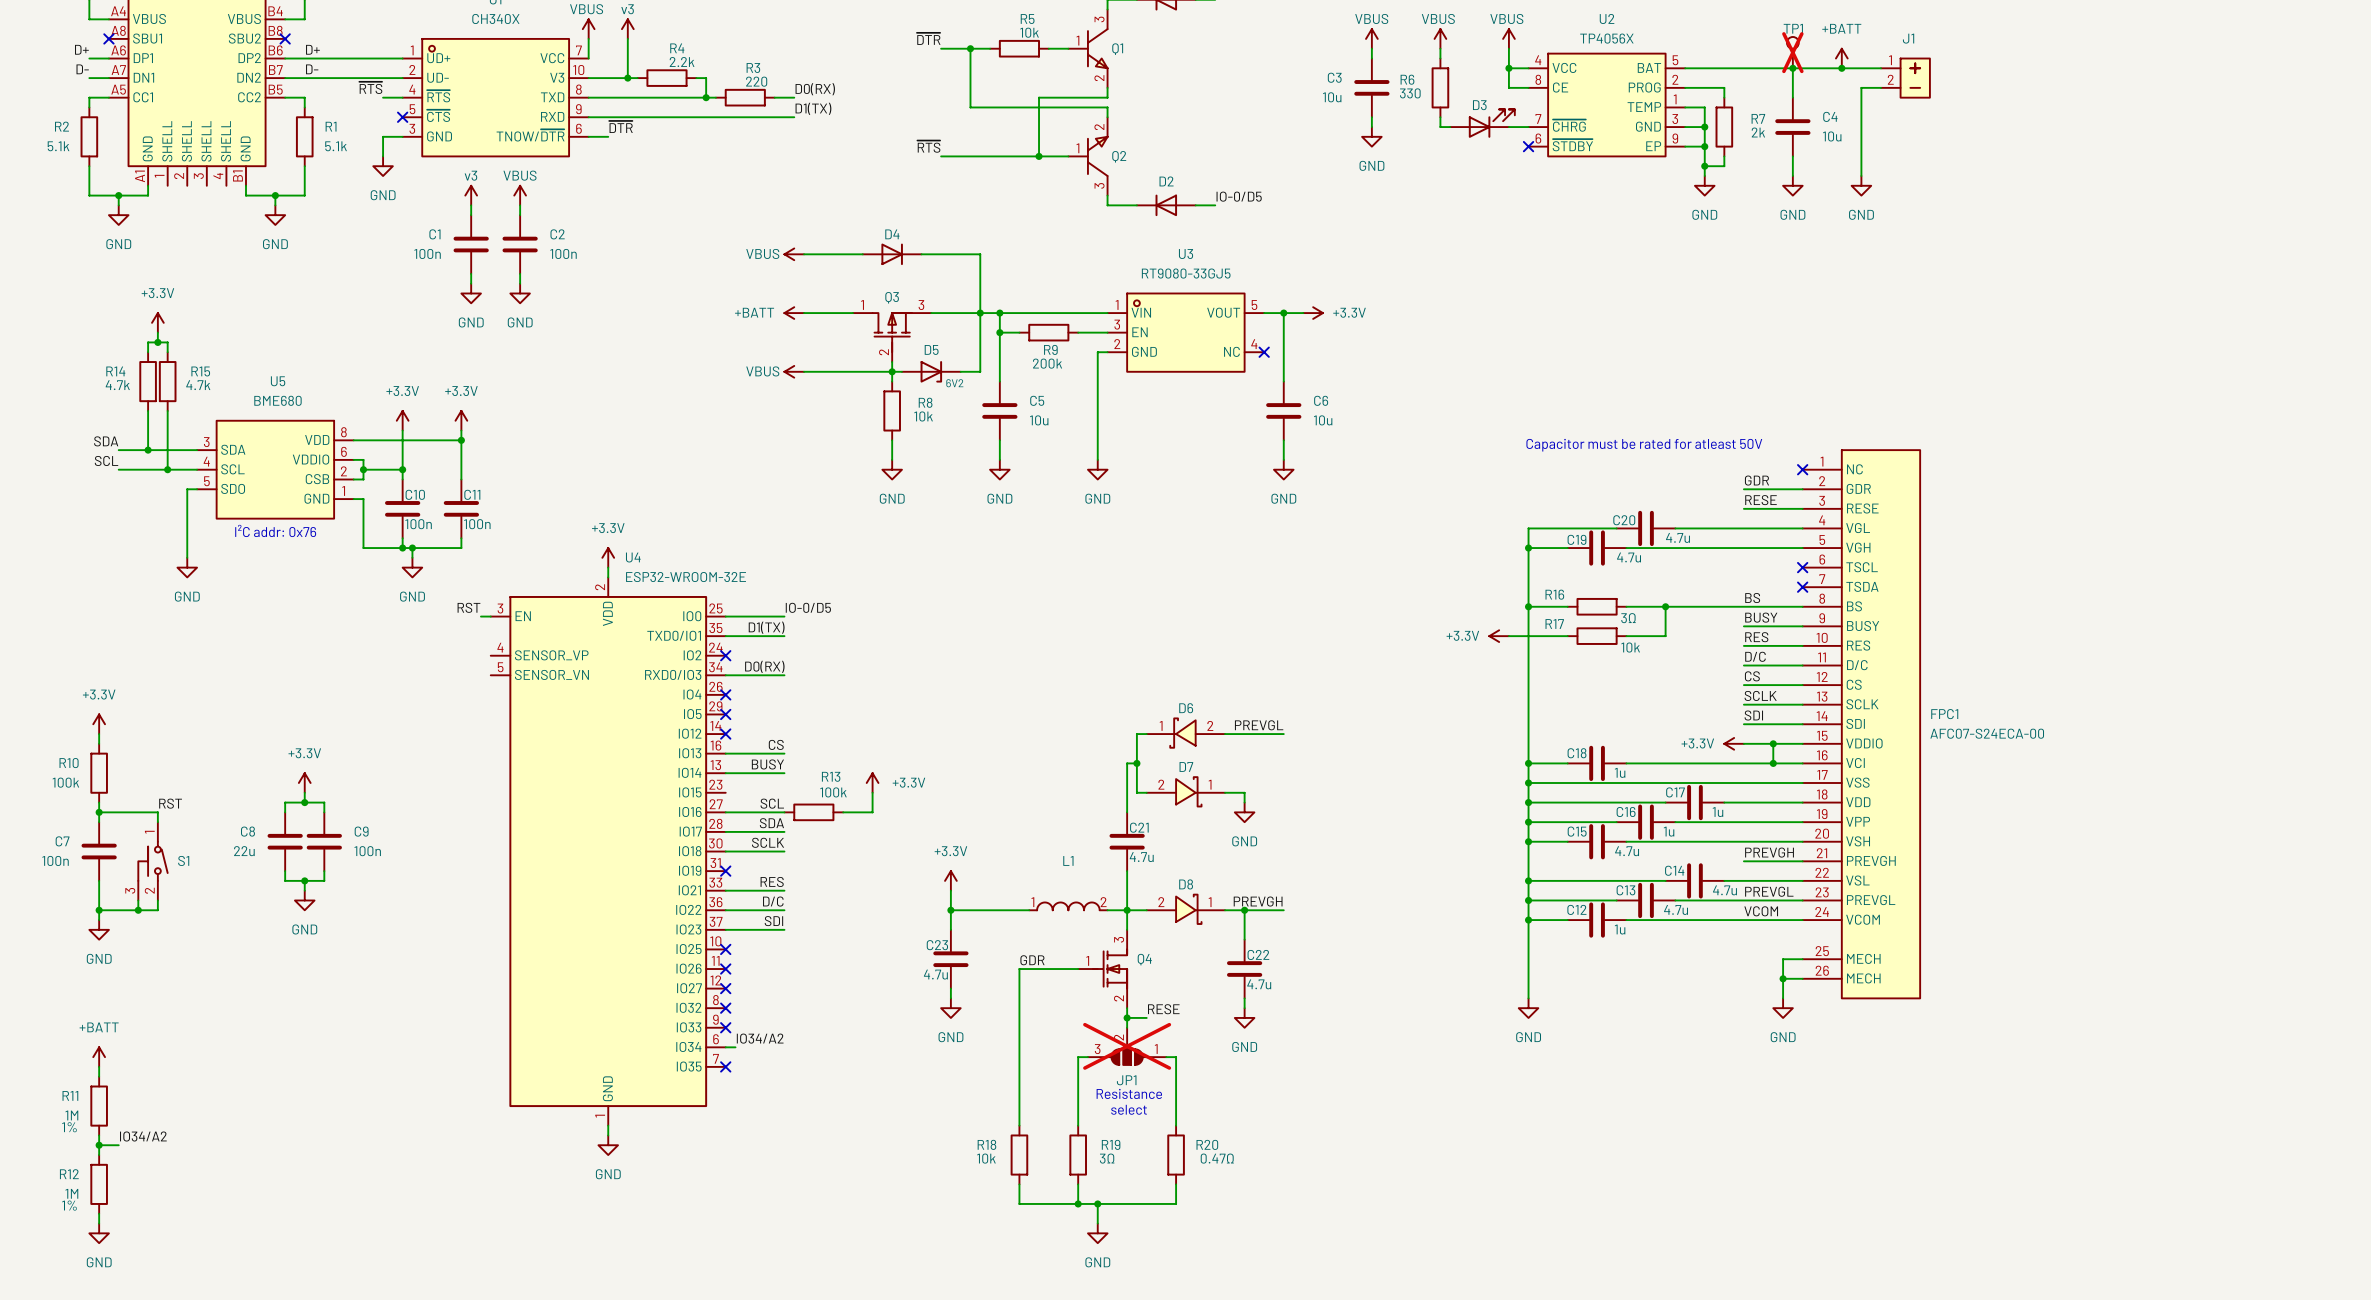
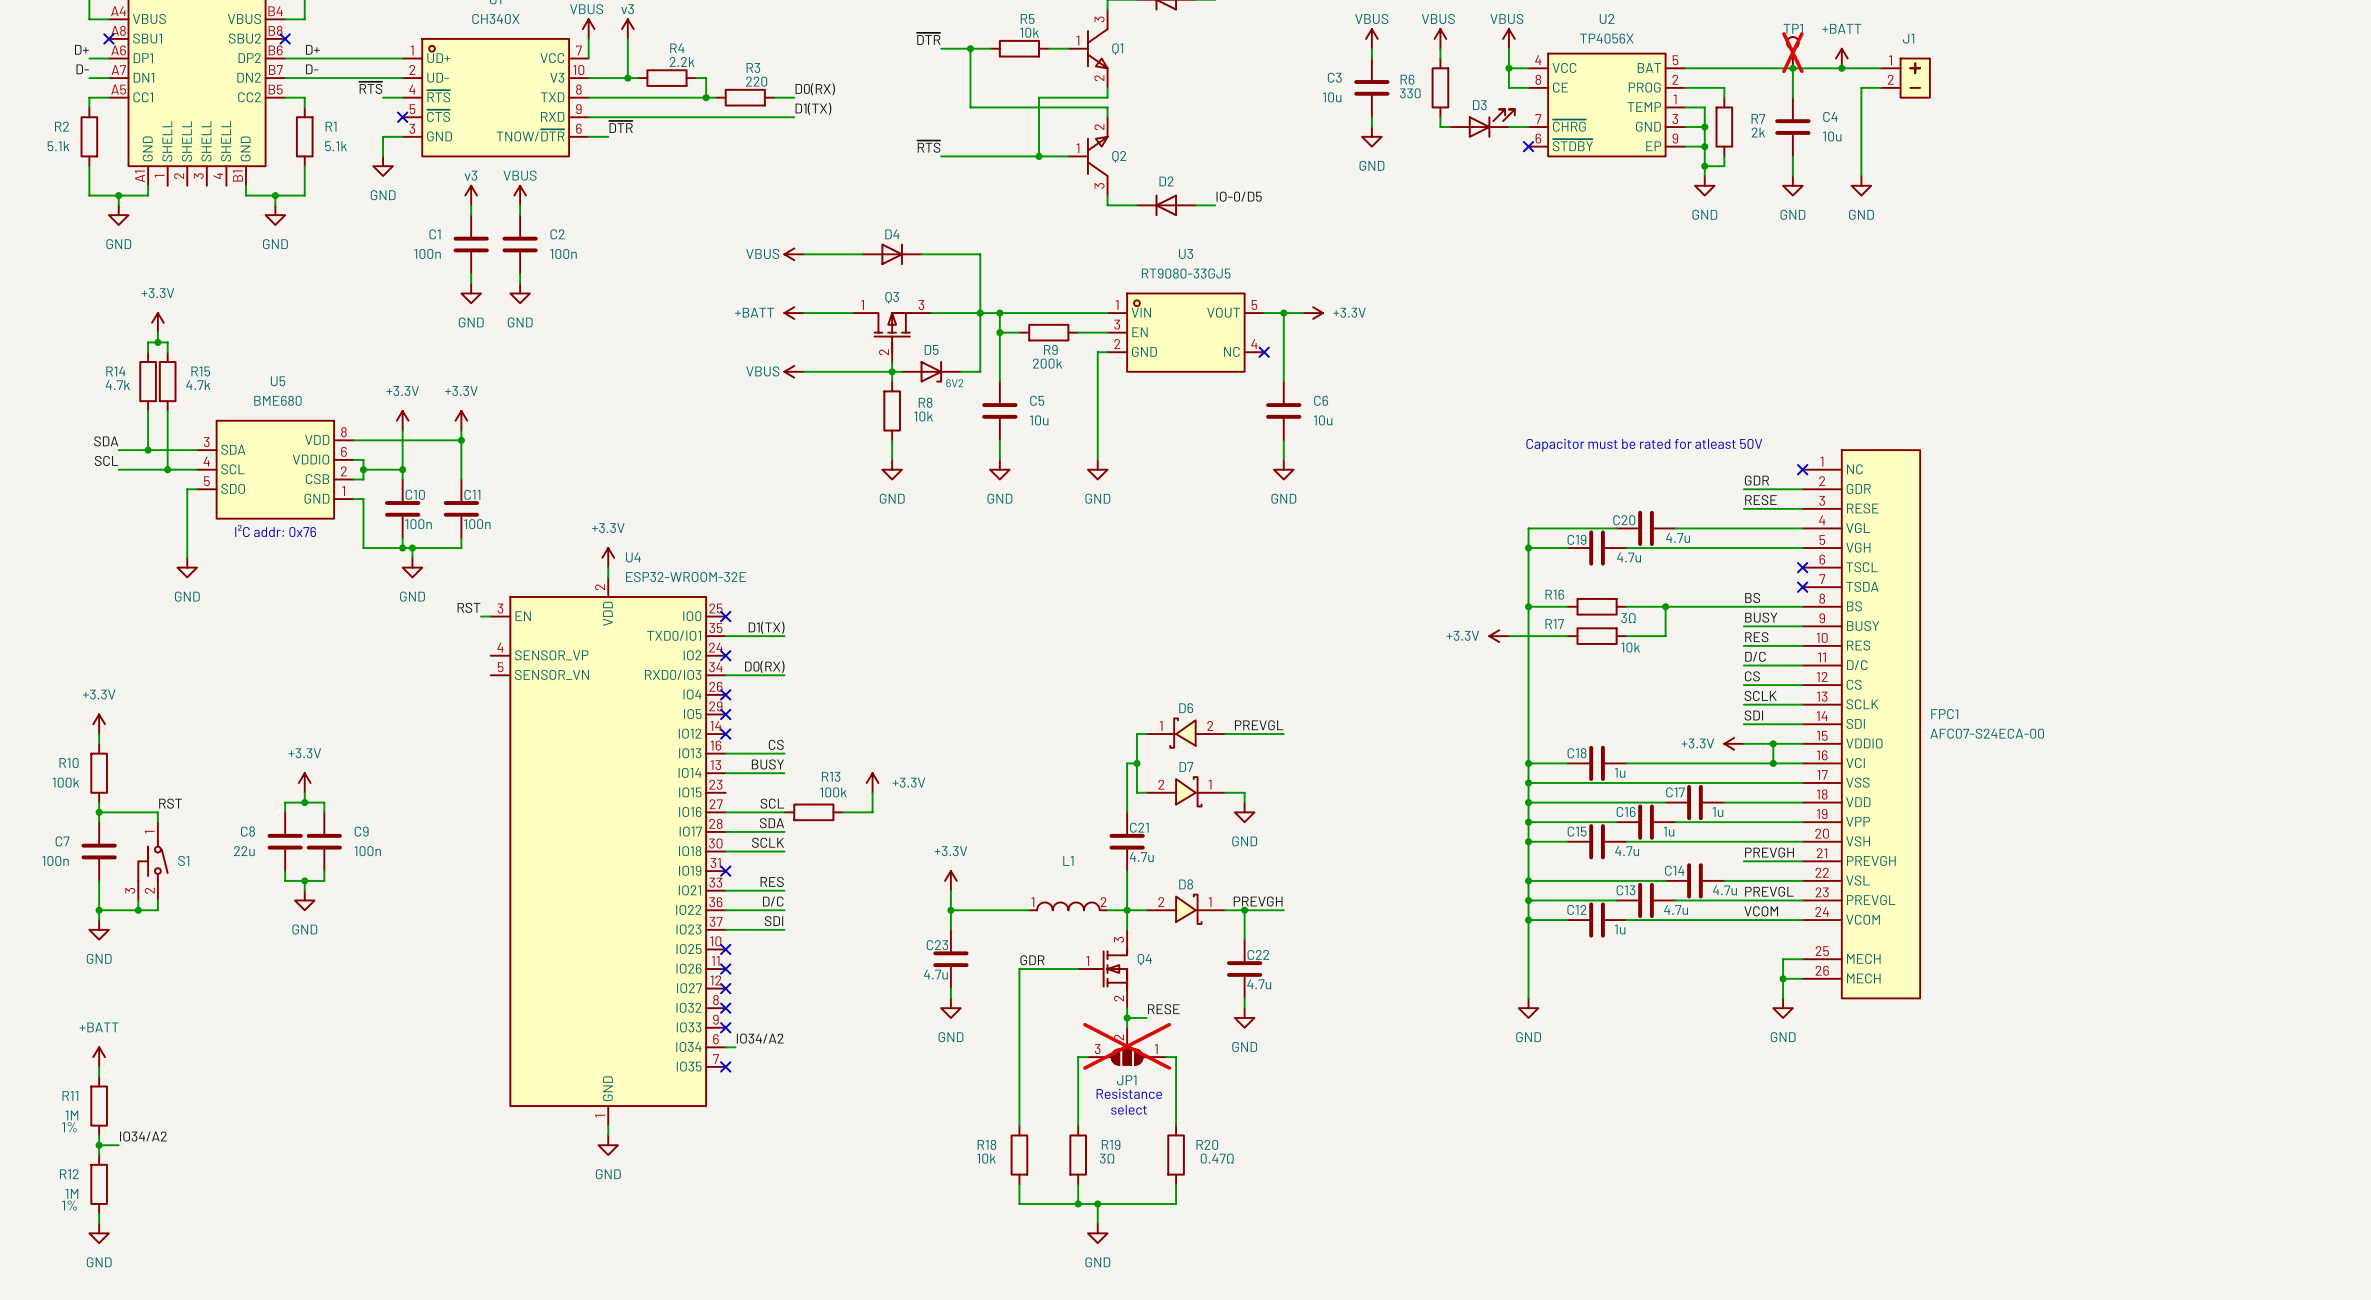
label: IO-0/D5 (808, 607) -> none
wire: (725, 616) (784, 616) -> none
no-connect mark: none -> (725, 616)

